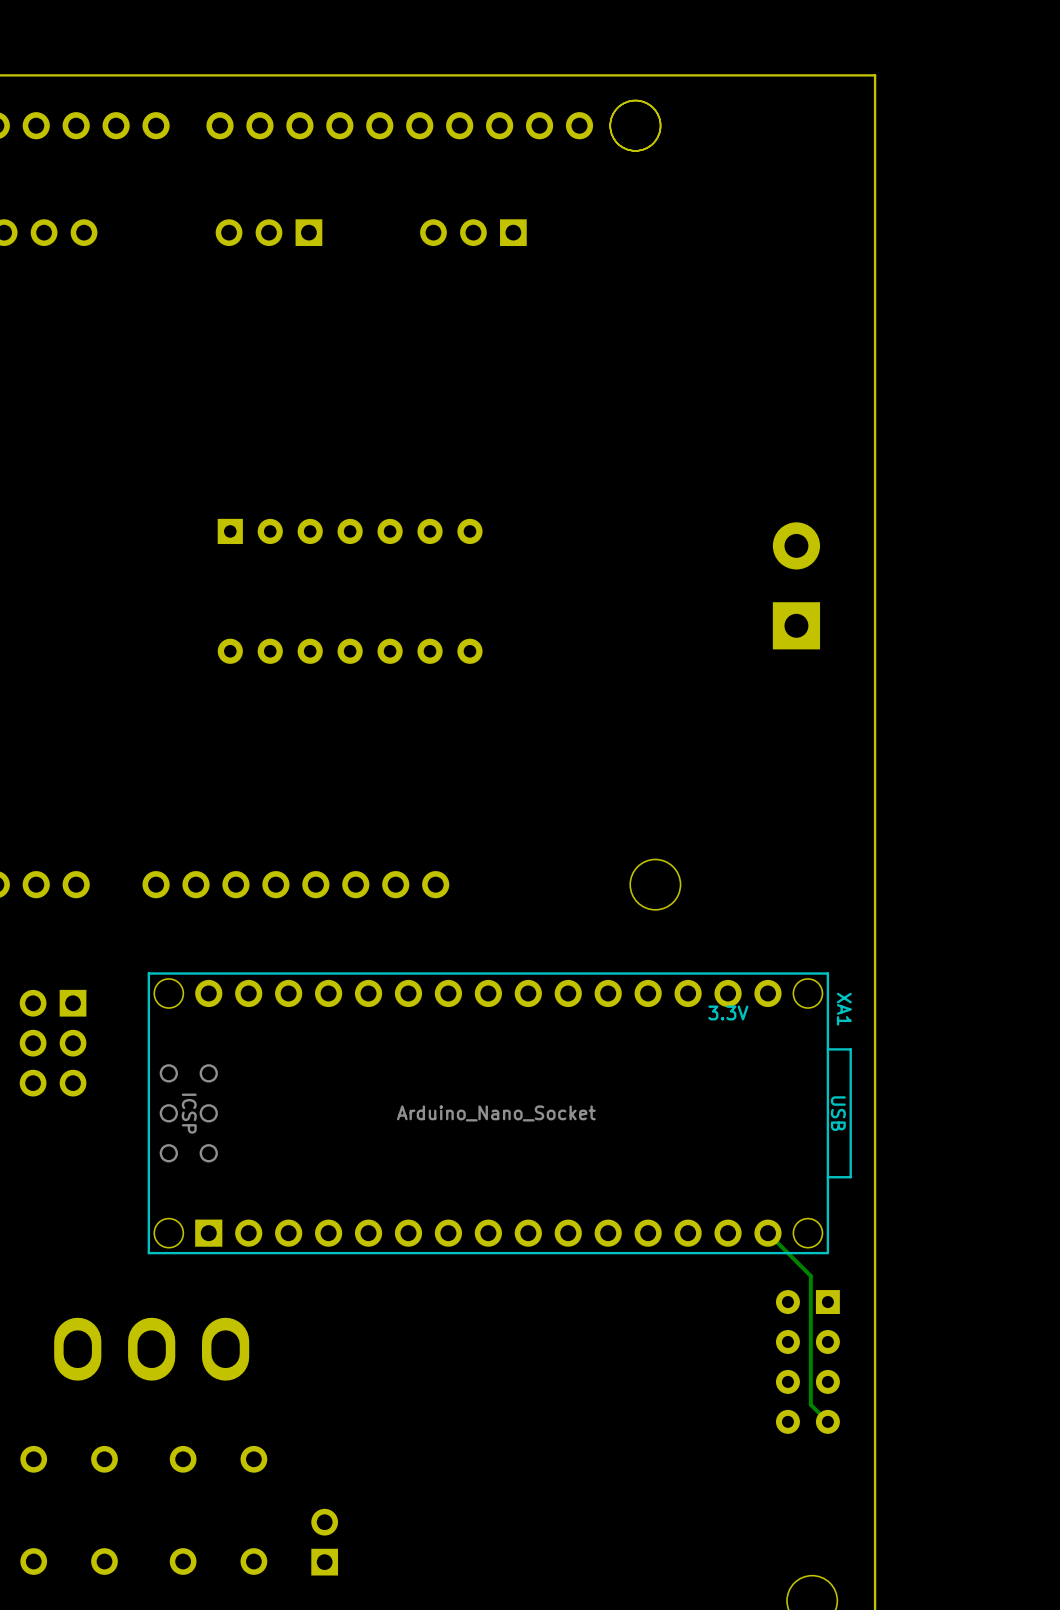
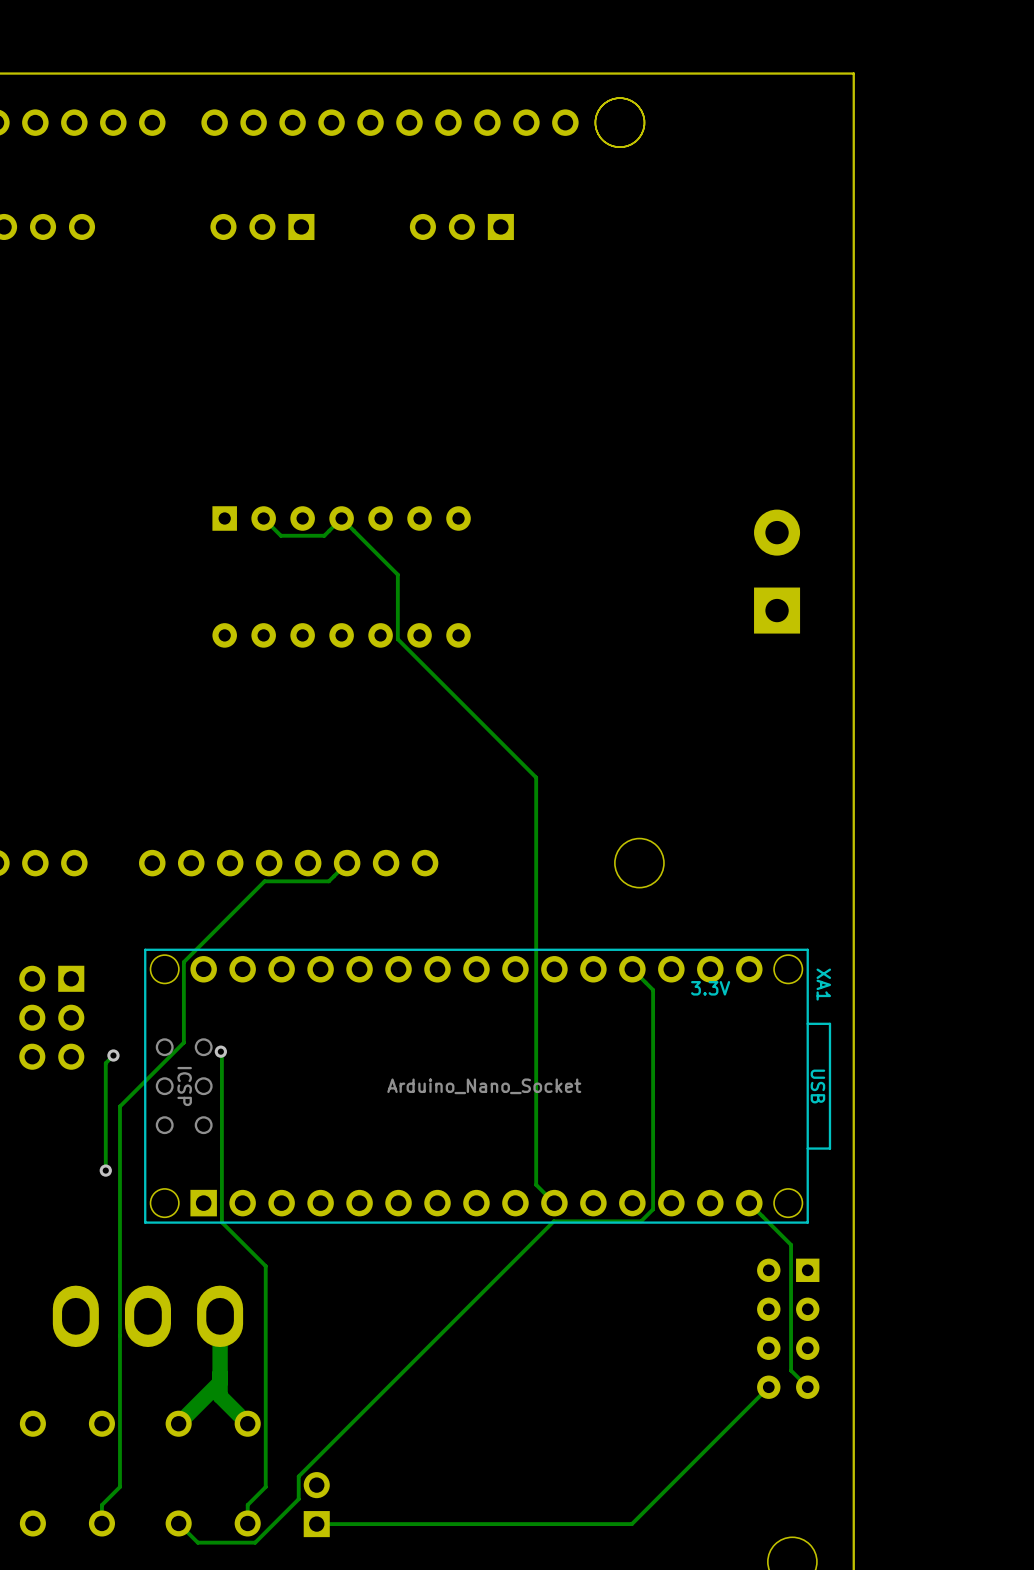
track: none -> (263, 518) (280, 535) (324, 535) (341, 518) (397, 574) (397, 639) (536, 777) (536, 1184) (554, 1203)
track: none -> (347, 863) (328, 881) (264, 881) (183, 962) (183, 1042) (119, 1106) (119, 1335)
track: none -> (632, 969) (653, 990) (653, 1209) (641, 1221) (553, 1221) (298, 1476) (298, 1499) (255, 1542) (197, 1542) (178, 1523)
track: none -> (220, 1051) (221, 1222) (265, 1266) (265, 1487) (247, 1505) (247, 1523)
via: none -> (220, 1051)
track: none -> (113, 1055) (105, 1063) (105, 1170)
via: none -> (113, 1055)
via: none -> (105, 1170)
track: none -> (220, 1316) (220, 1396) (247, 1423)
track: none -> (119, 1335) (119, 1487) (101, 1505) (101, 1523)
track: none -> (220, 1382) (178, 1423)
track: none -> (768, 1387) (631, 1524) (316, 1524)

